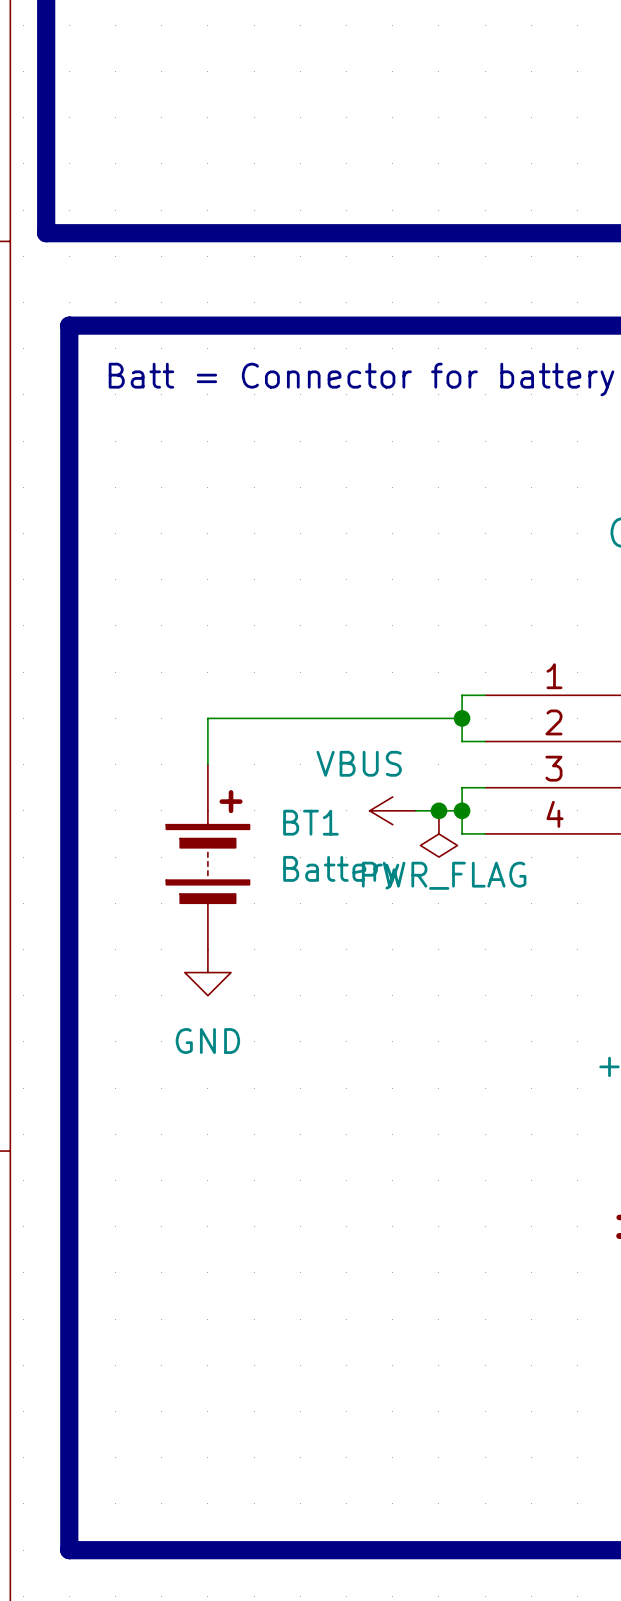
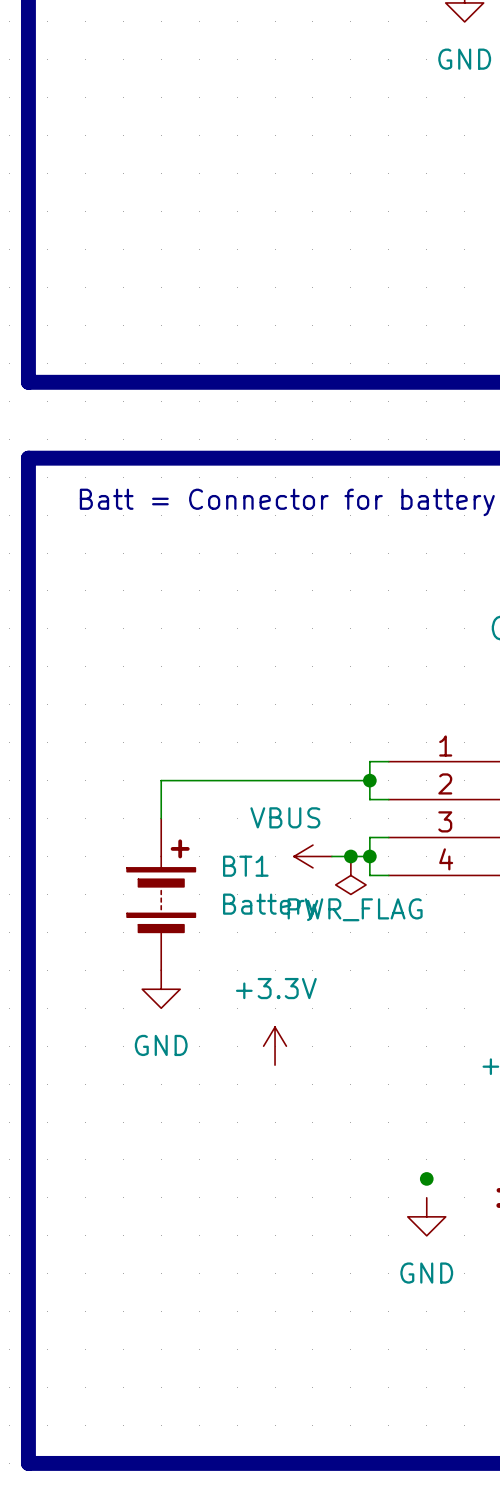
line: (69, 325) (69, 1550) -> (47, 458) (28, 458) (28, 1463) (47, 1463)
power symbol: none -> +3.3V (275, 1046)
junction: none -> (426, 1178)
power symbol: none -> GND (426, 1216)

